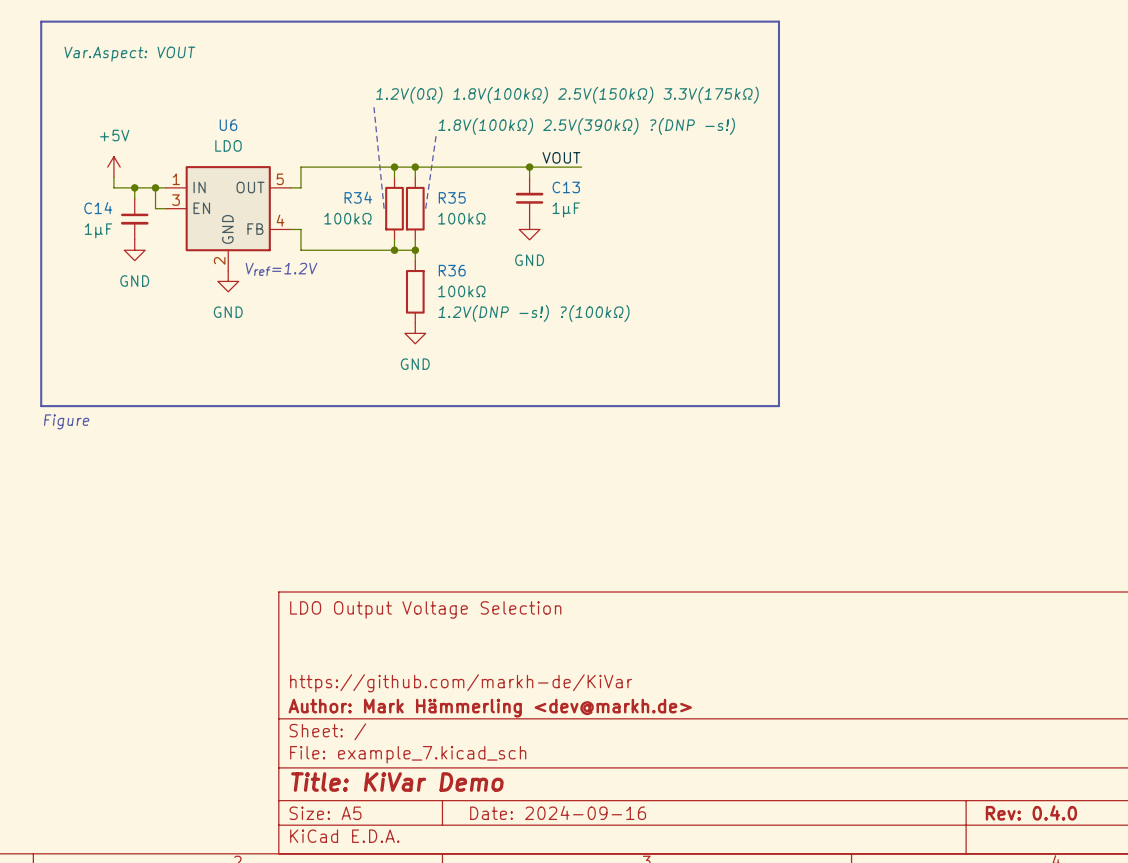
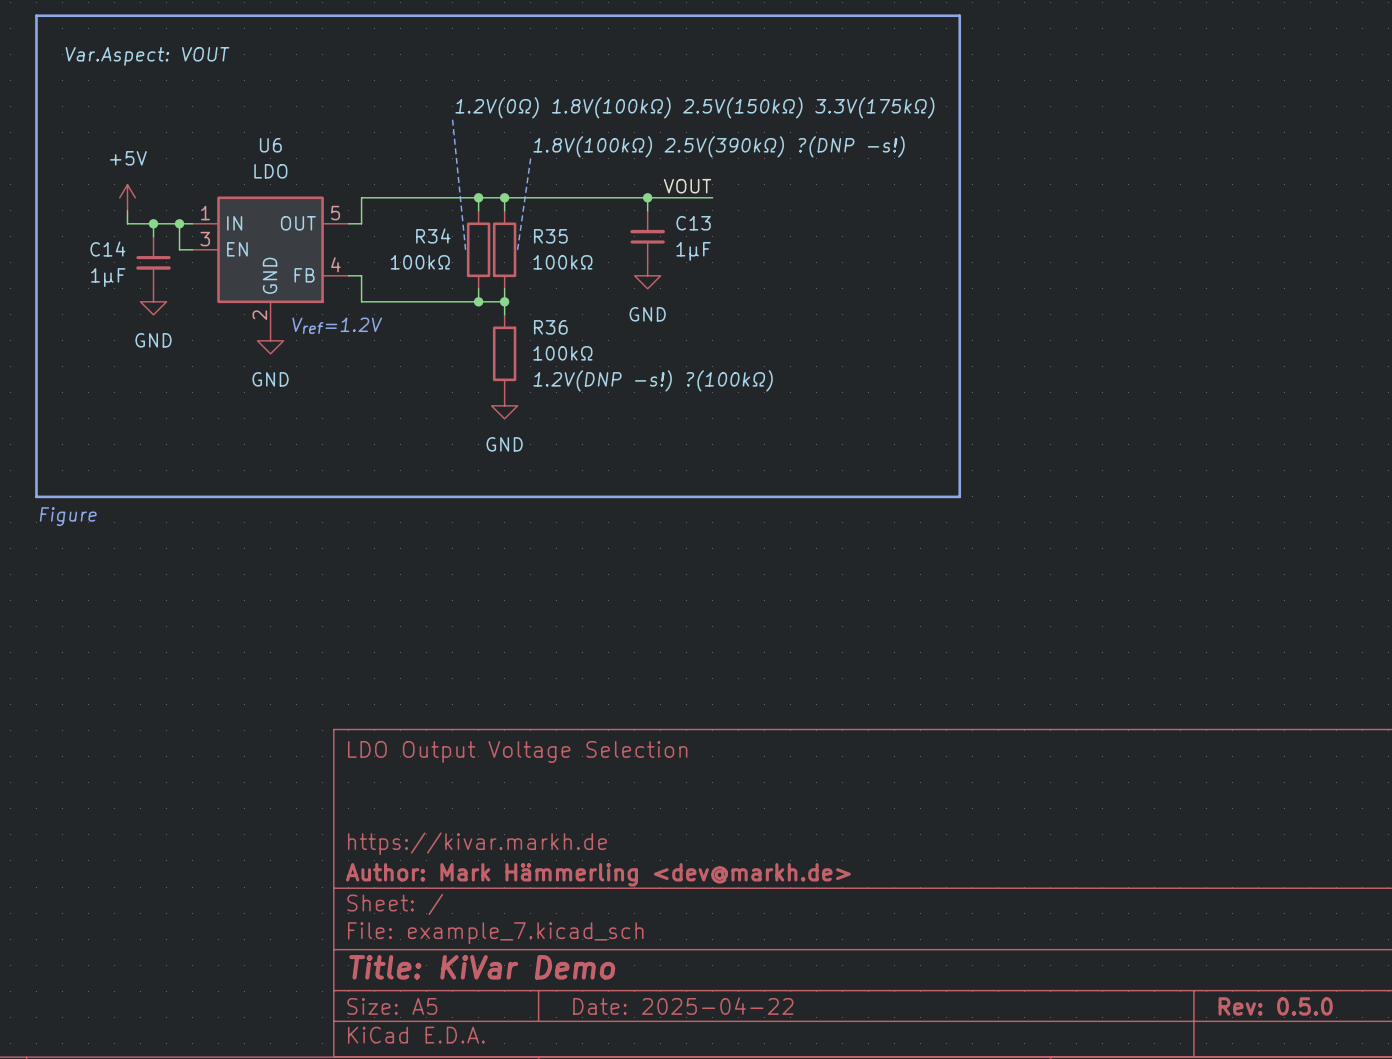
title block: https://github.com/markh-de/KiVar (461, 683) -> https://kivar.markh.de (477, 843)
title block: Date: 2024-09-16 (558, 812) -> Date: 2025-04-22 (683, 1006)
title block: Rev: 0.4.0 (1031, 812) -> Rev: 0.5.0 (1275, 1006)

